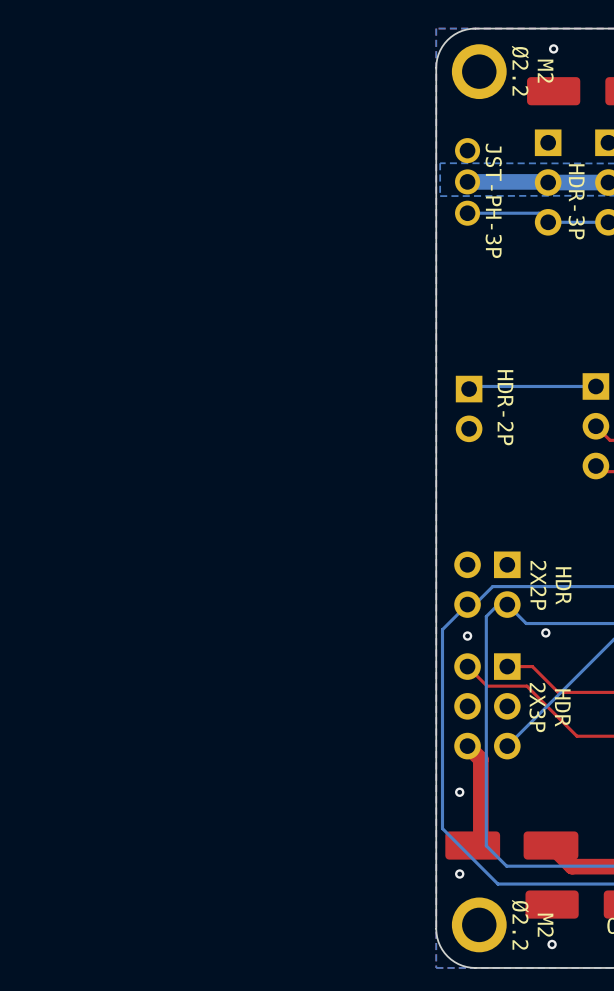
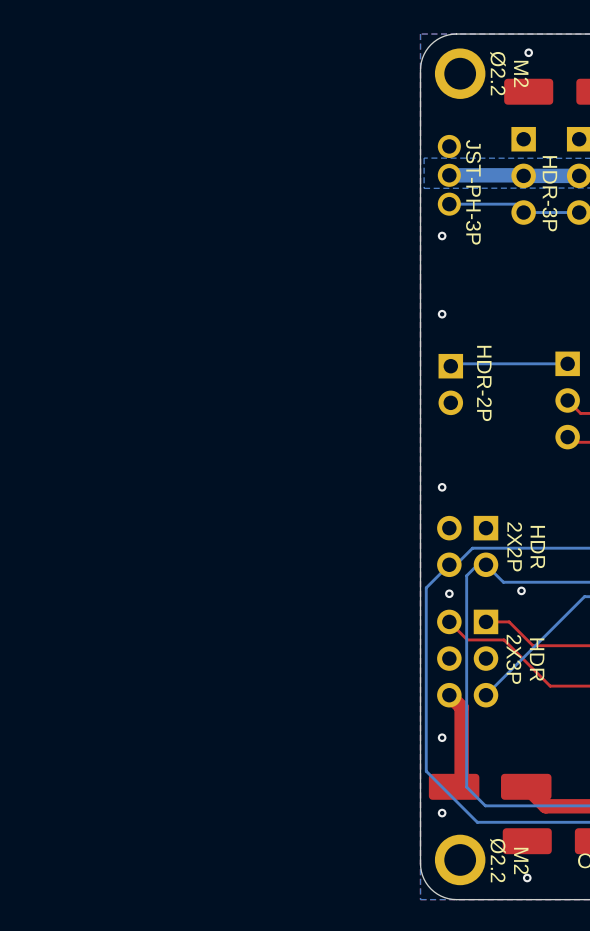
via: none -> (442, 236)
via: none -> (442, 314)
via: none -> (442, 487)

